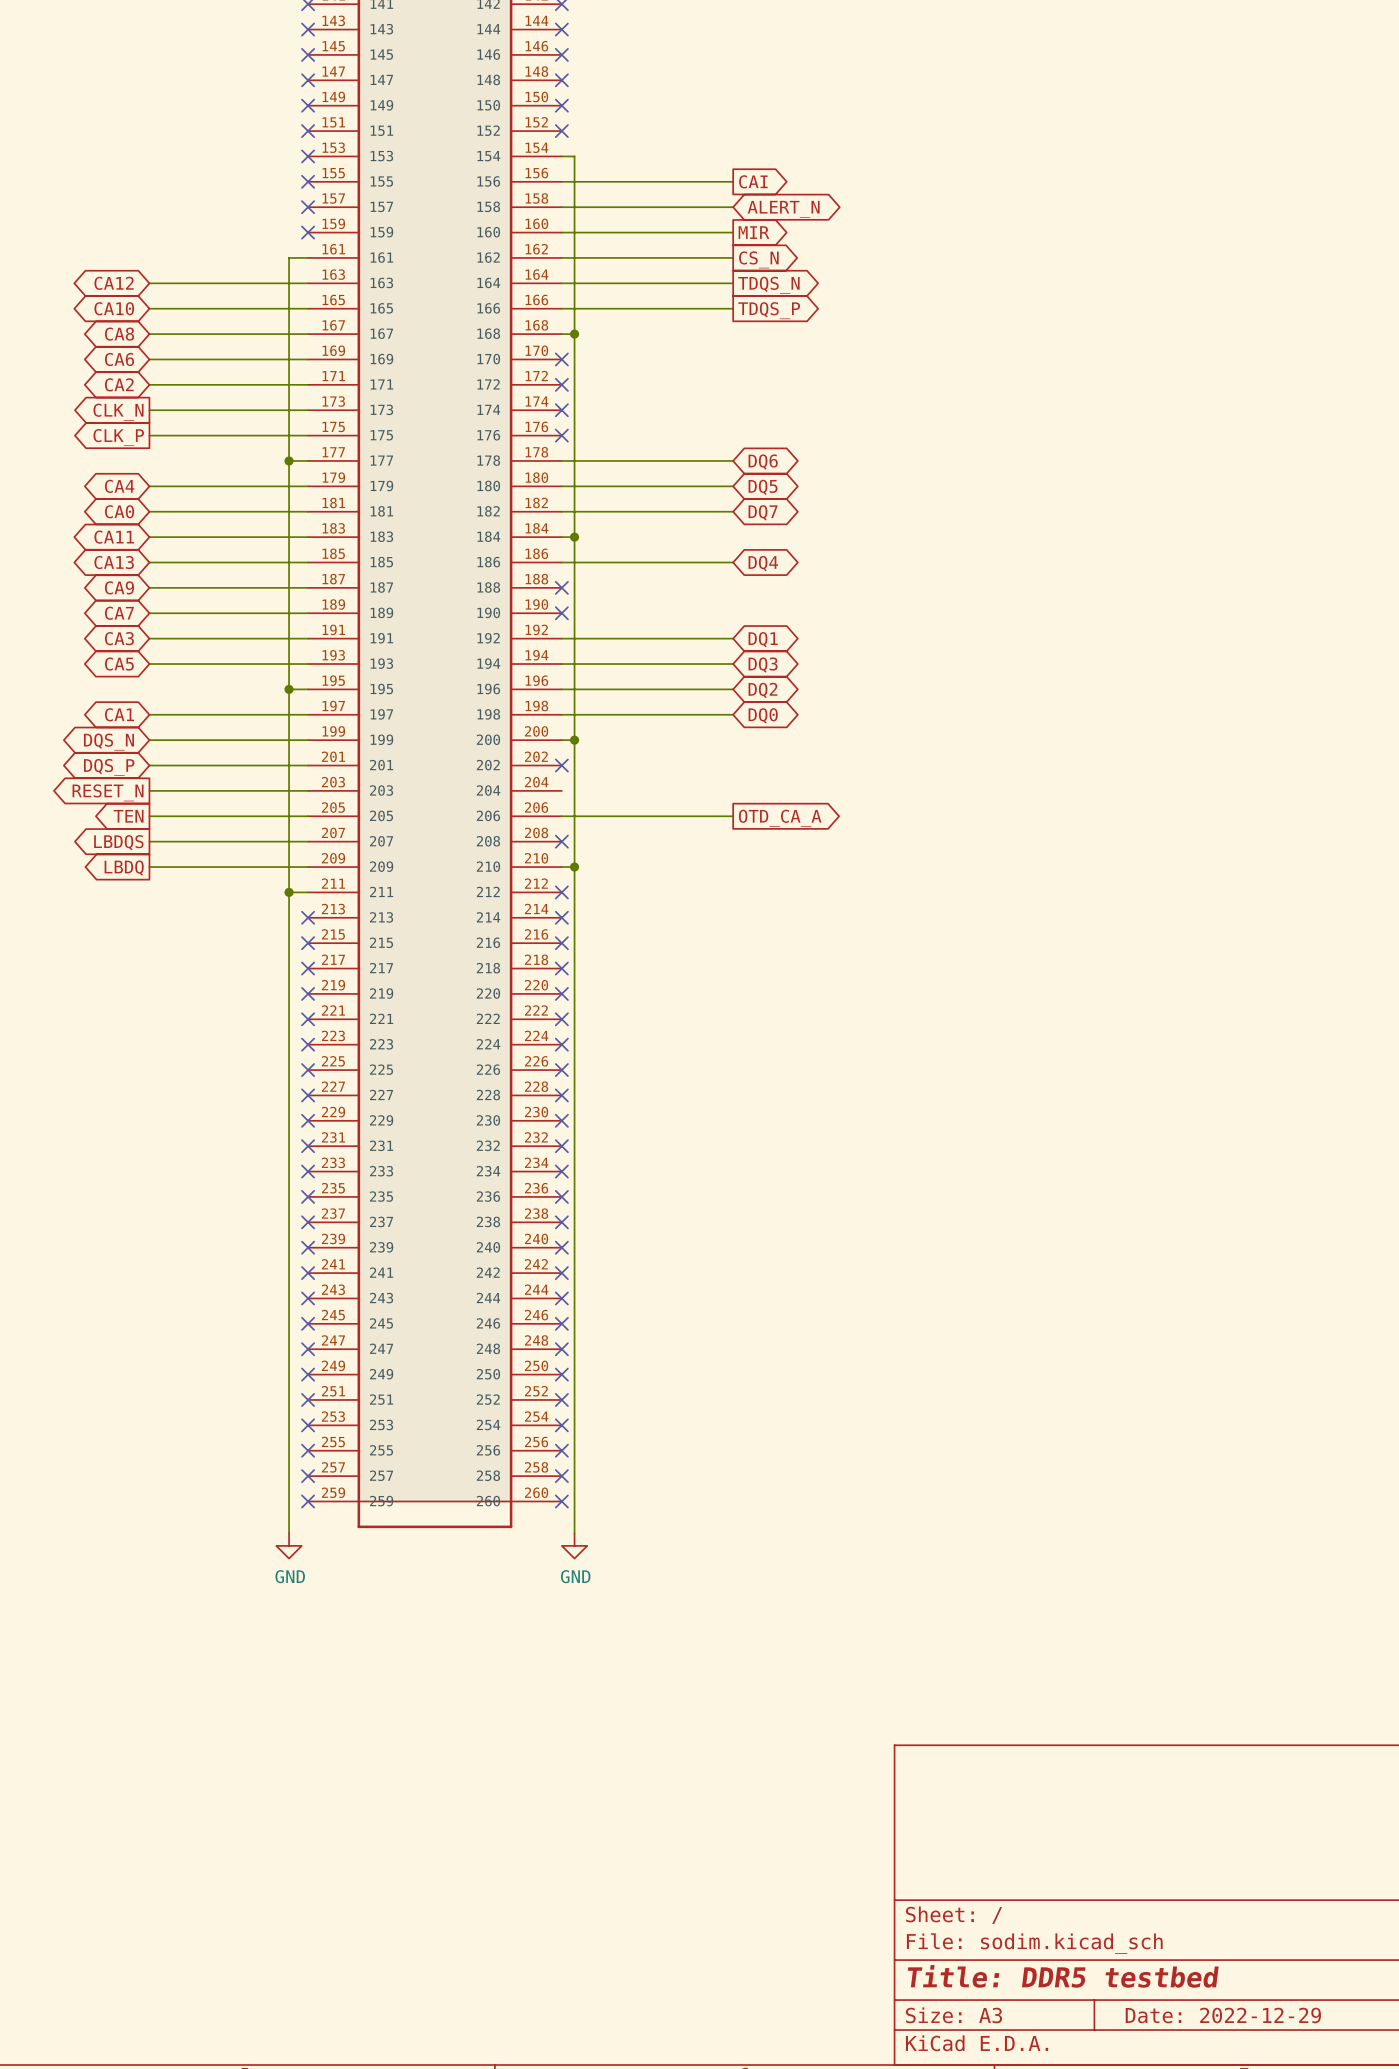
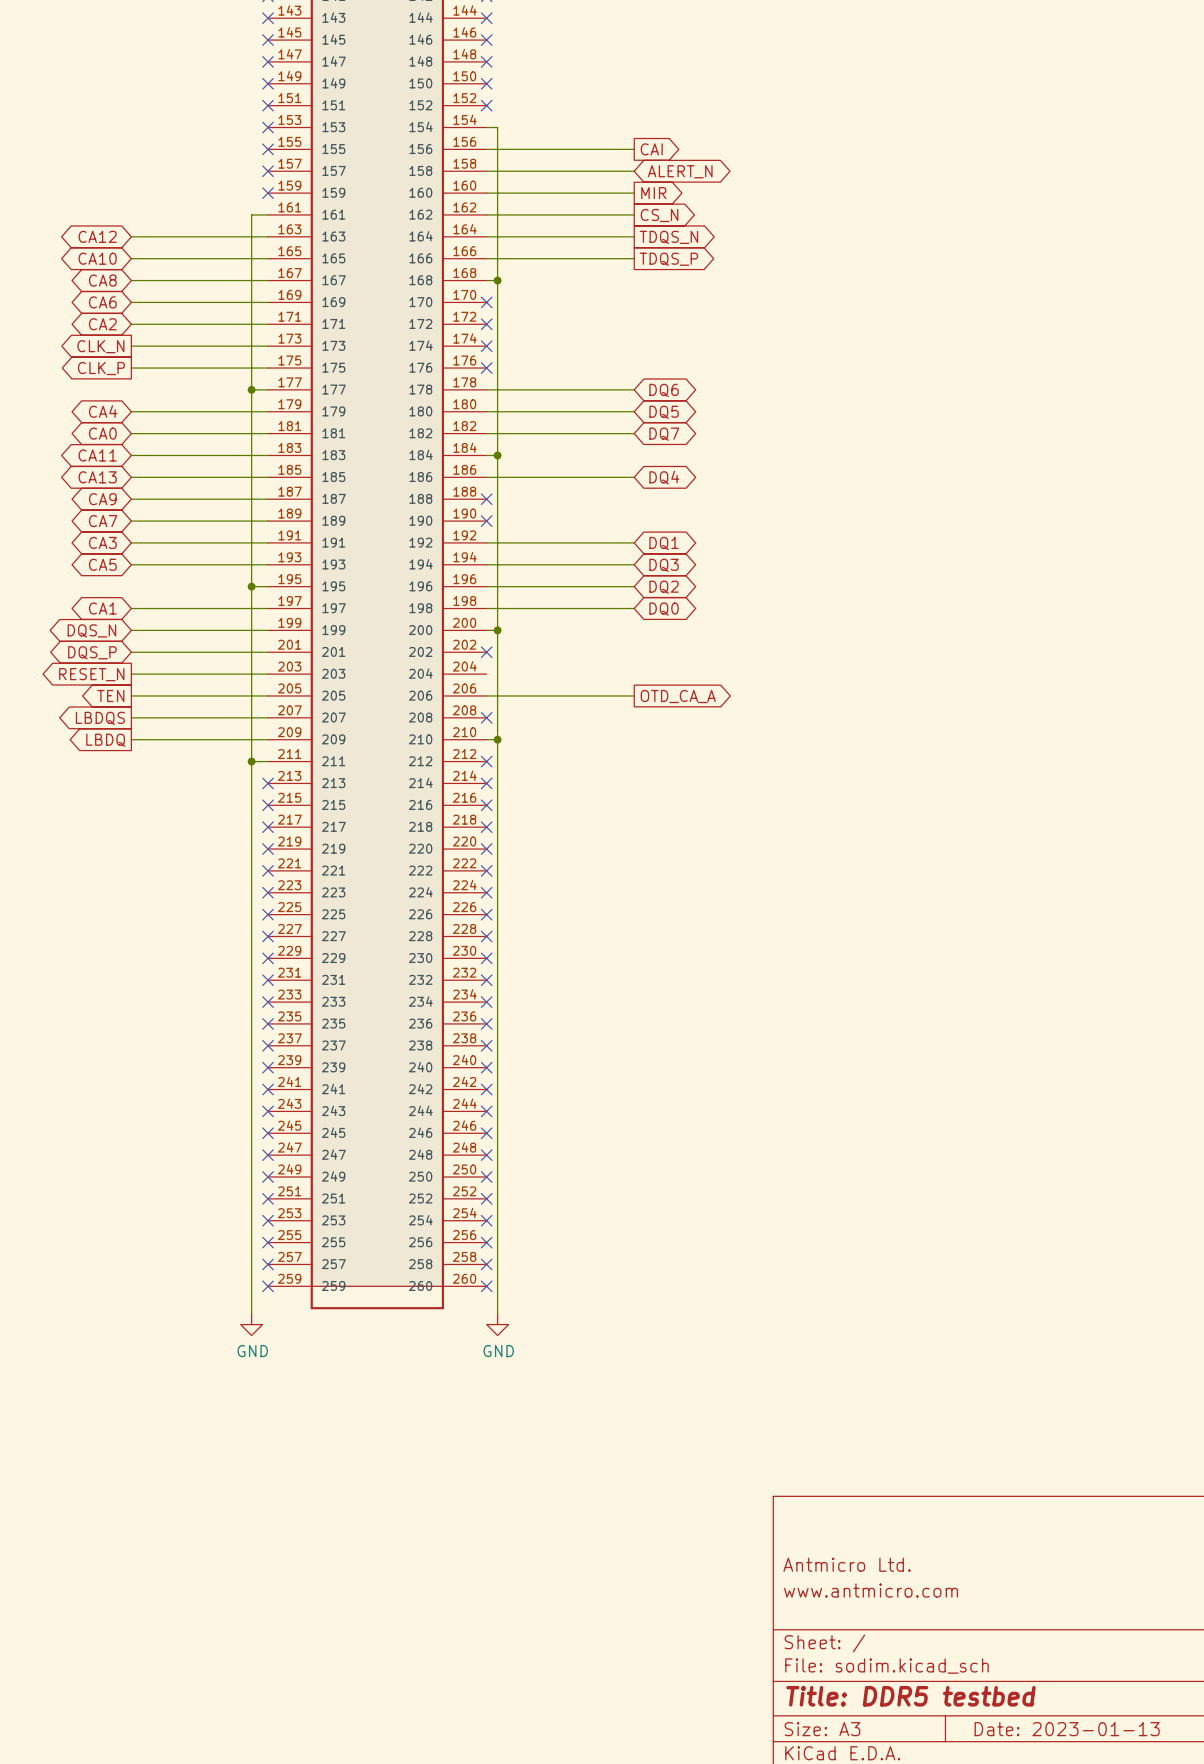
title block: none -> Antmicro Ltd. (847, 1564)
title block: none -> www.antmicro.com (871, 1590)
title block: Date: 2022-12-29 (1223, 2015) -> Date: 2023-01-13 (1067, 1729)

